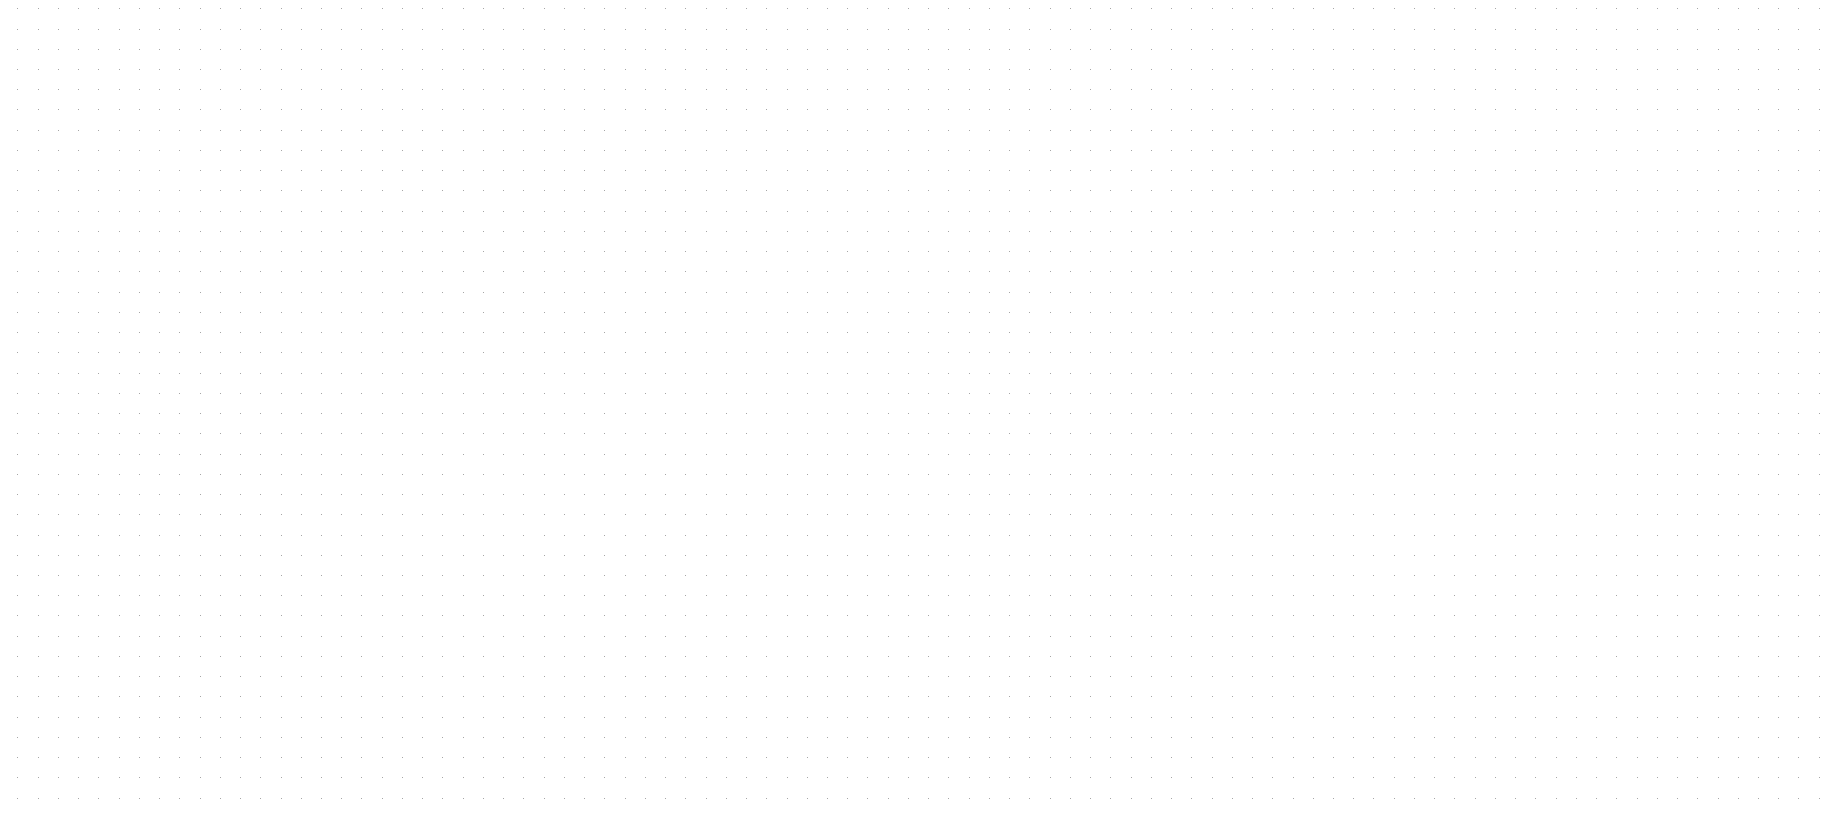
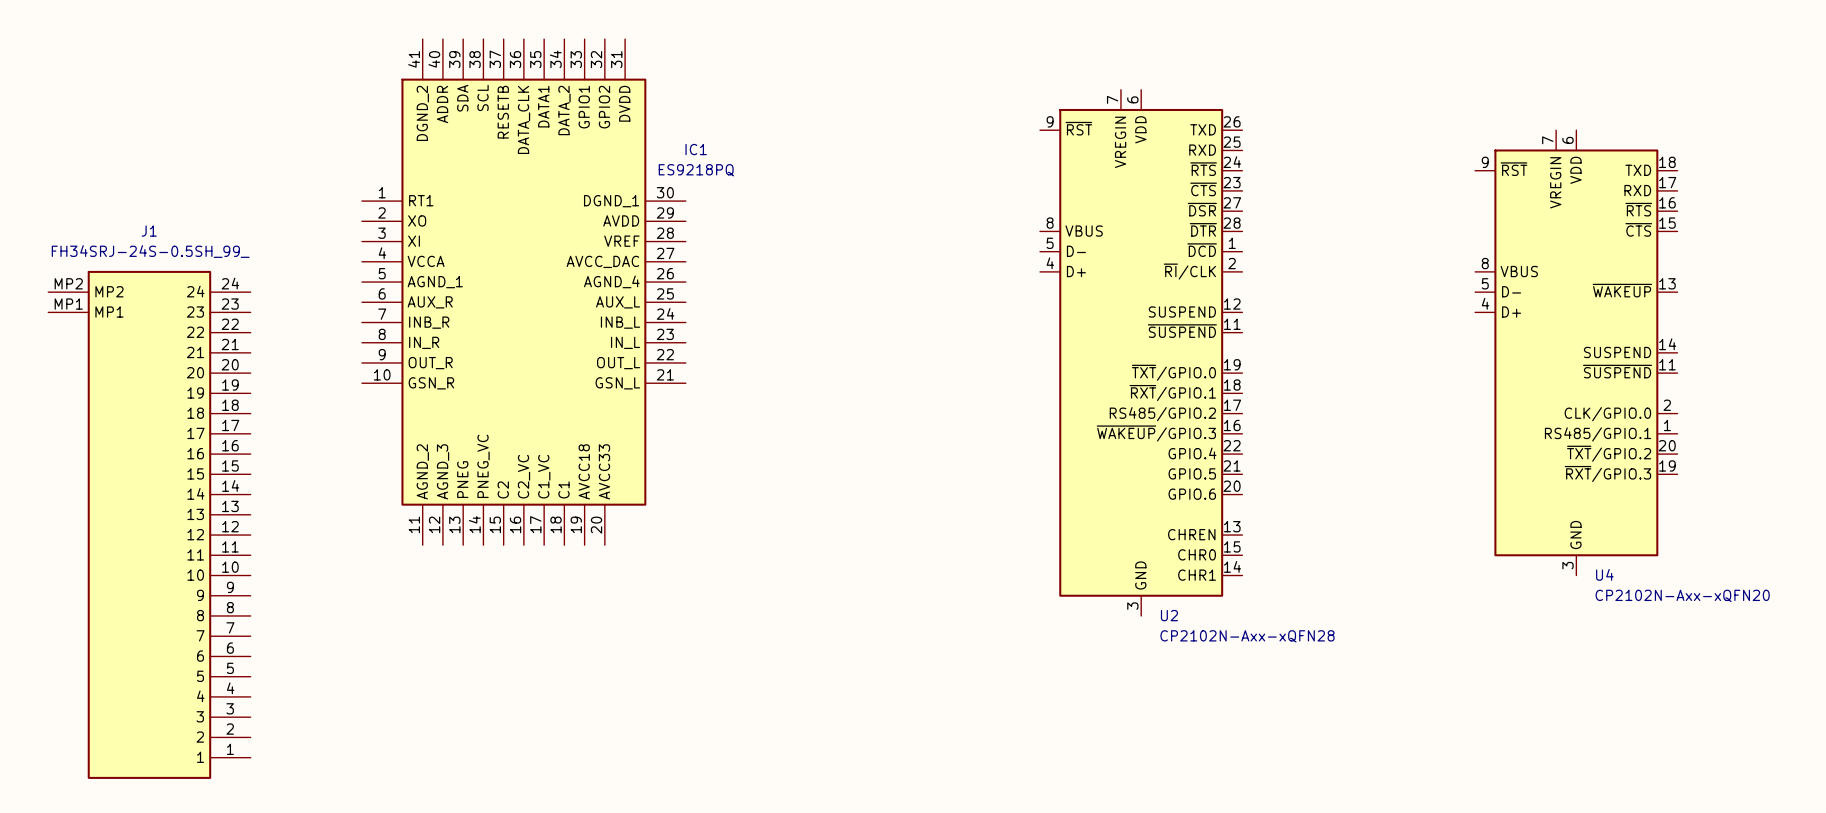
IC1: none -> ES9218PQ (523, 292)
U2: none -> CP2102N-Axx-xQFN28 (1141, 352)
U4: none -> CP2102N-Axx-xQFN20 (1576, 352)
J1: none -> FH34SRJ-24S-0.5SH_99_ (149, 524)

